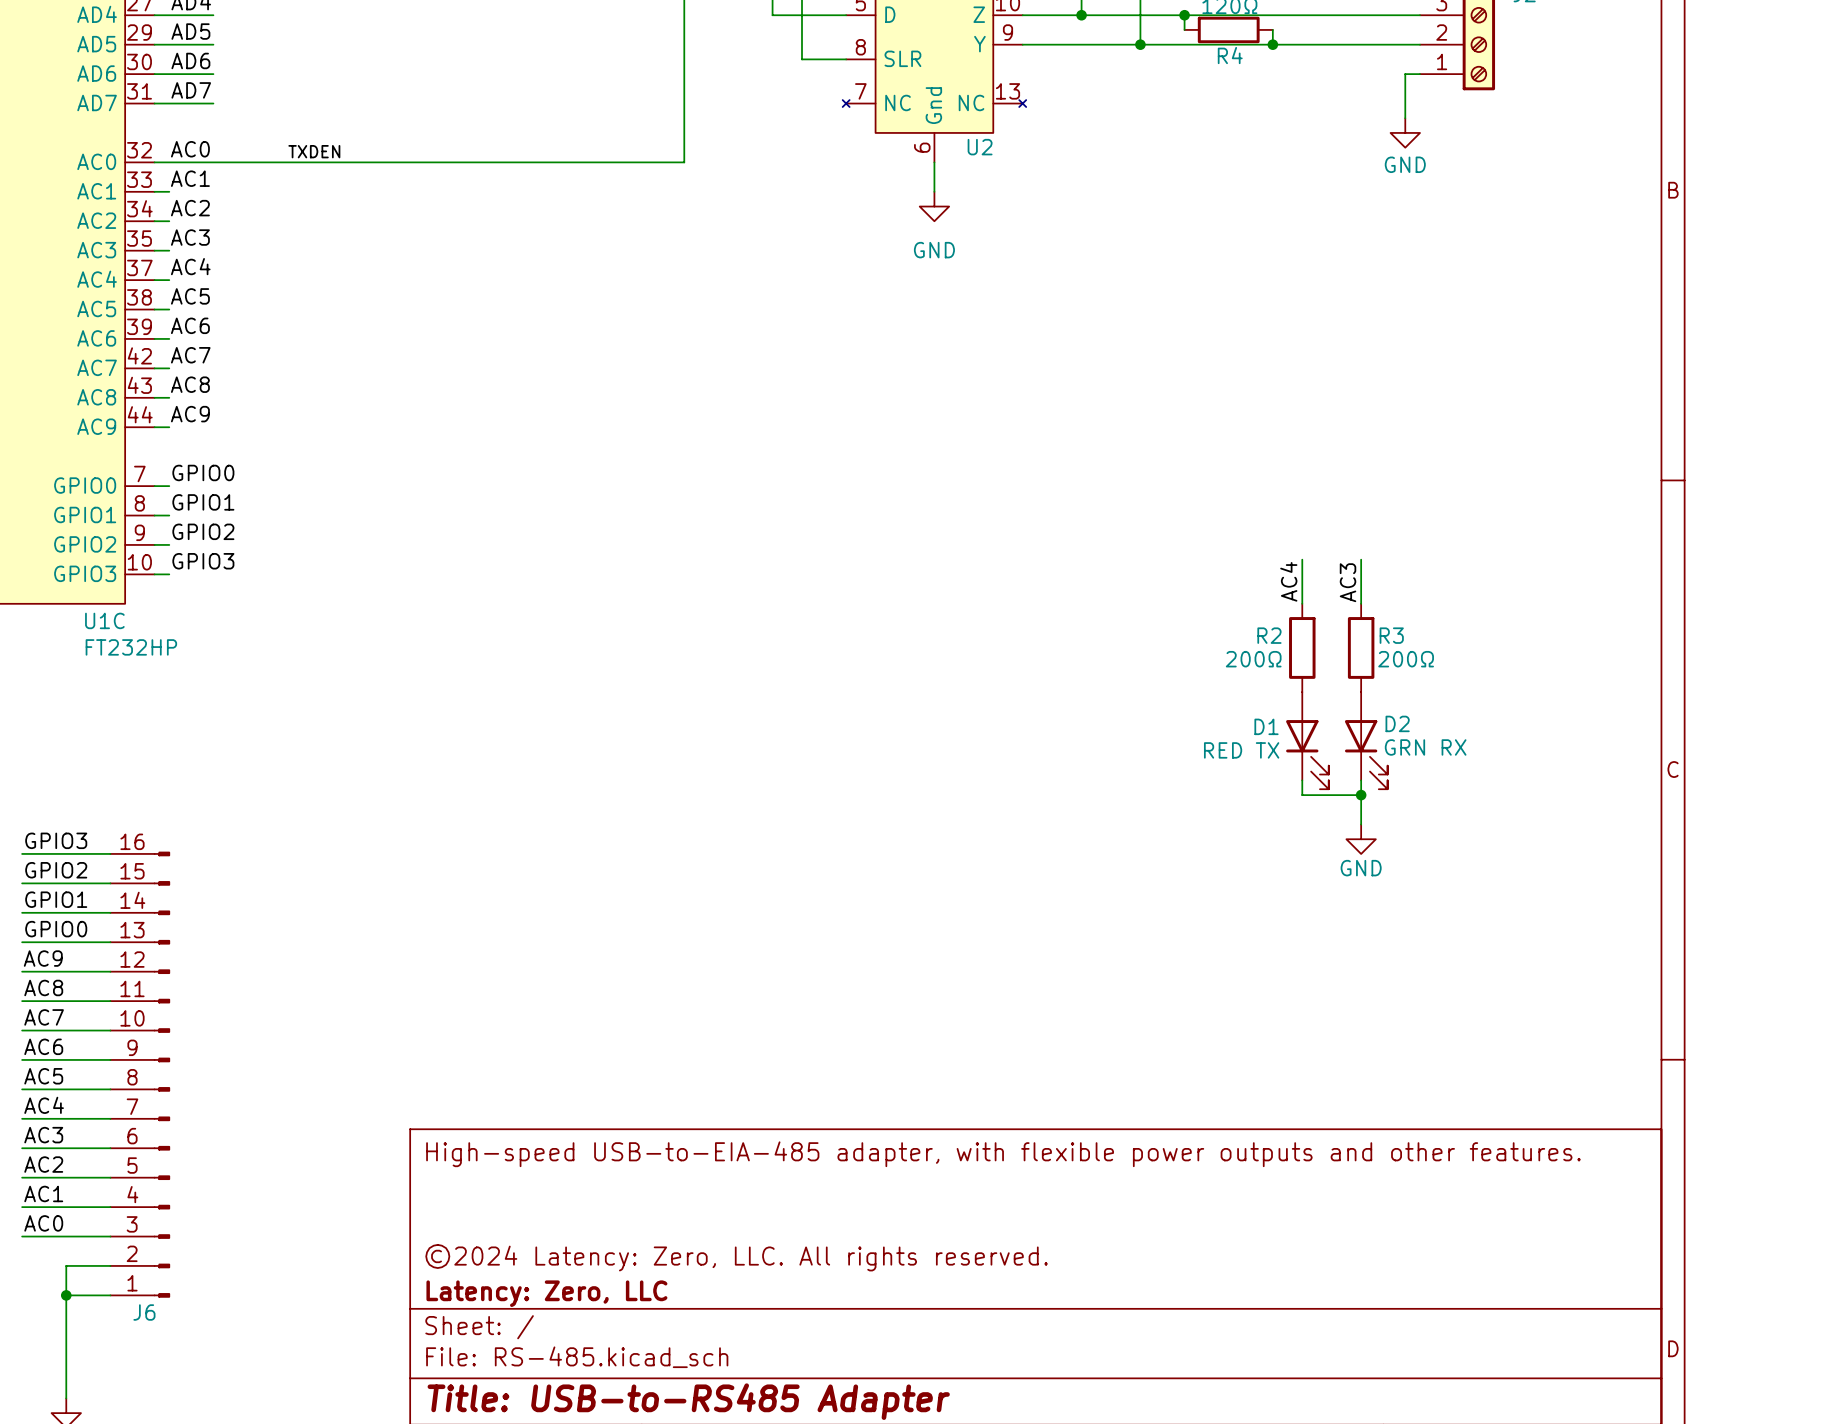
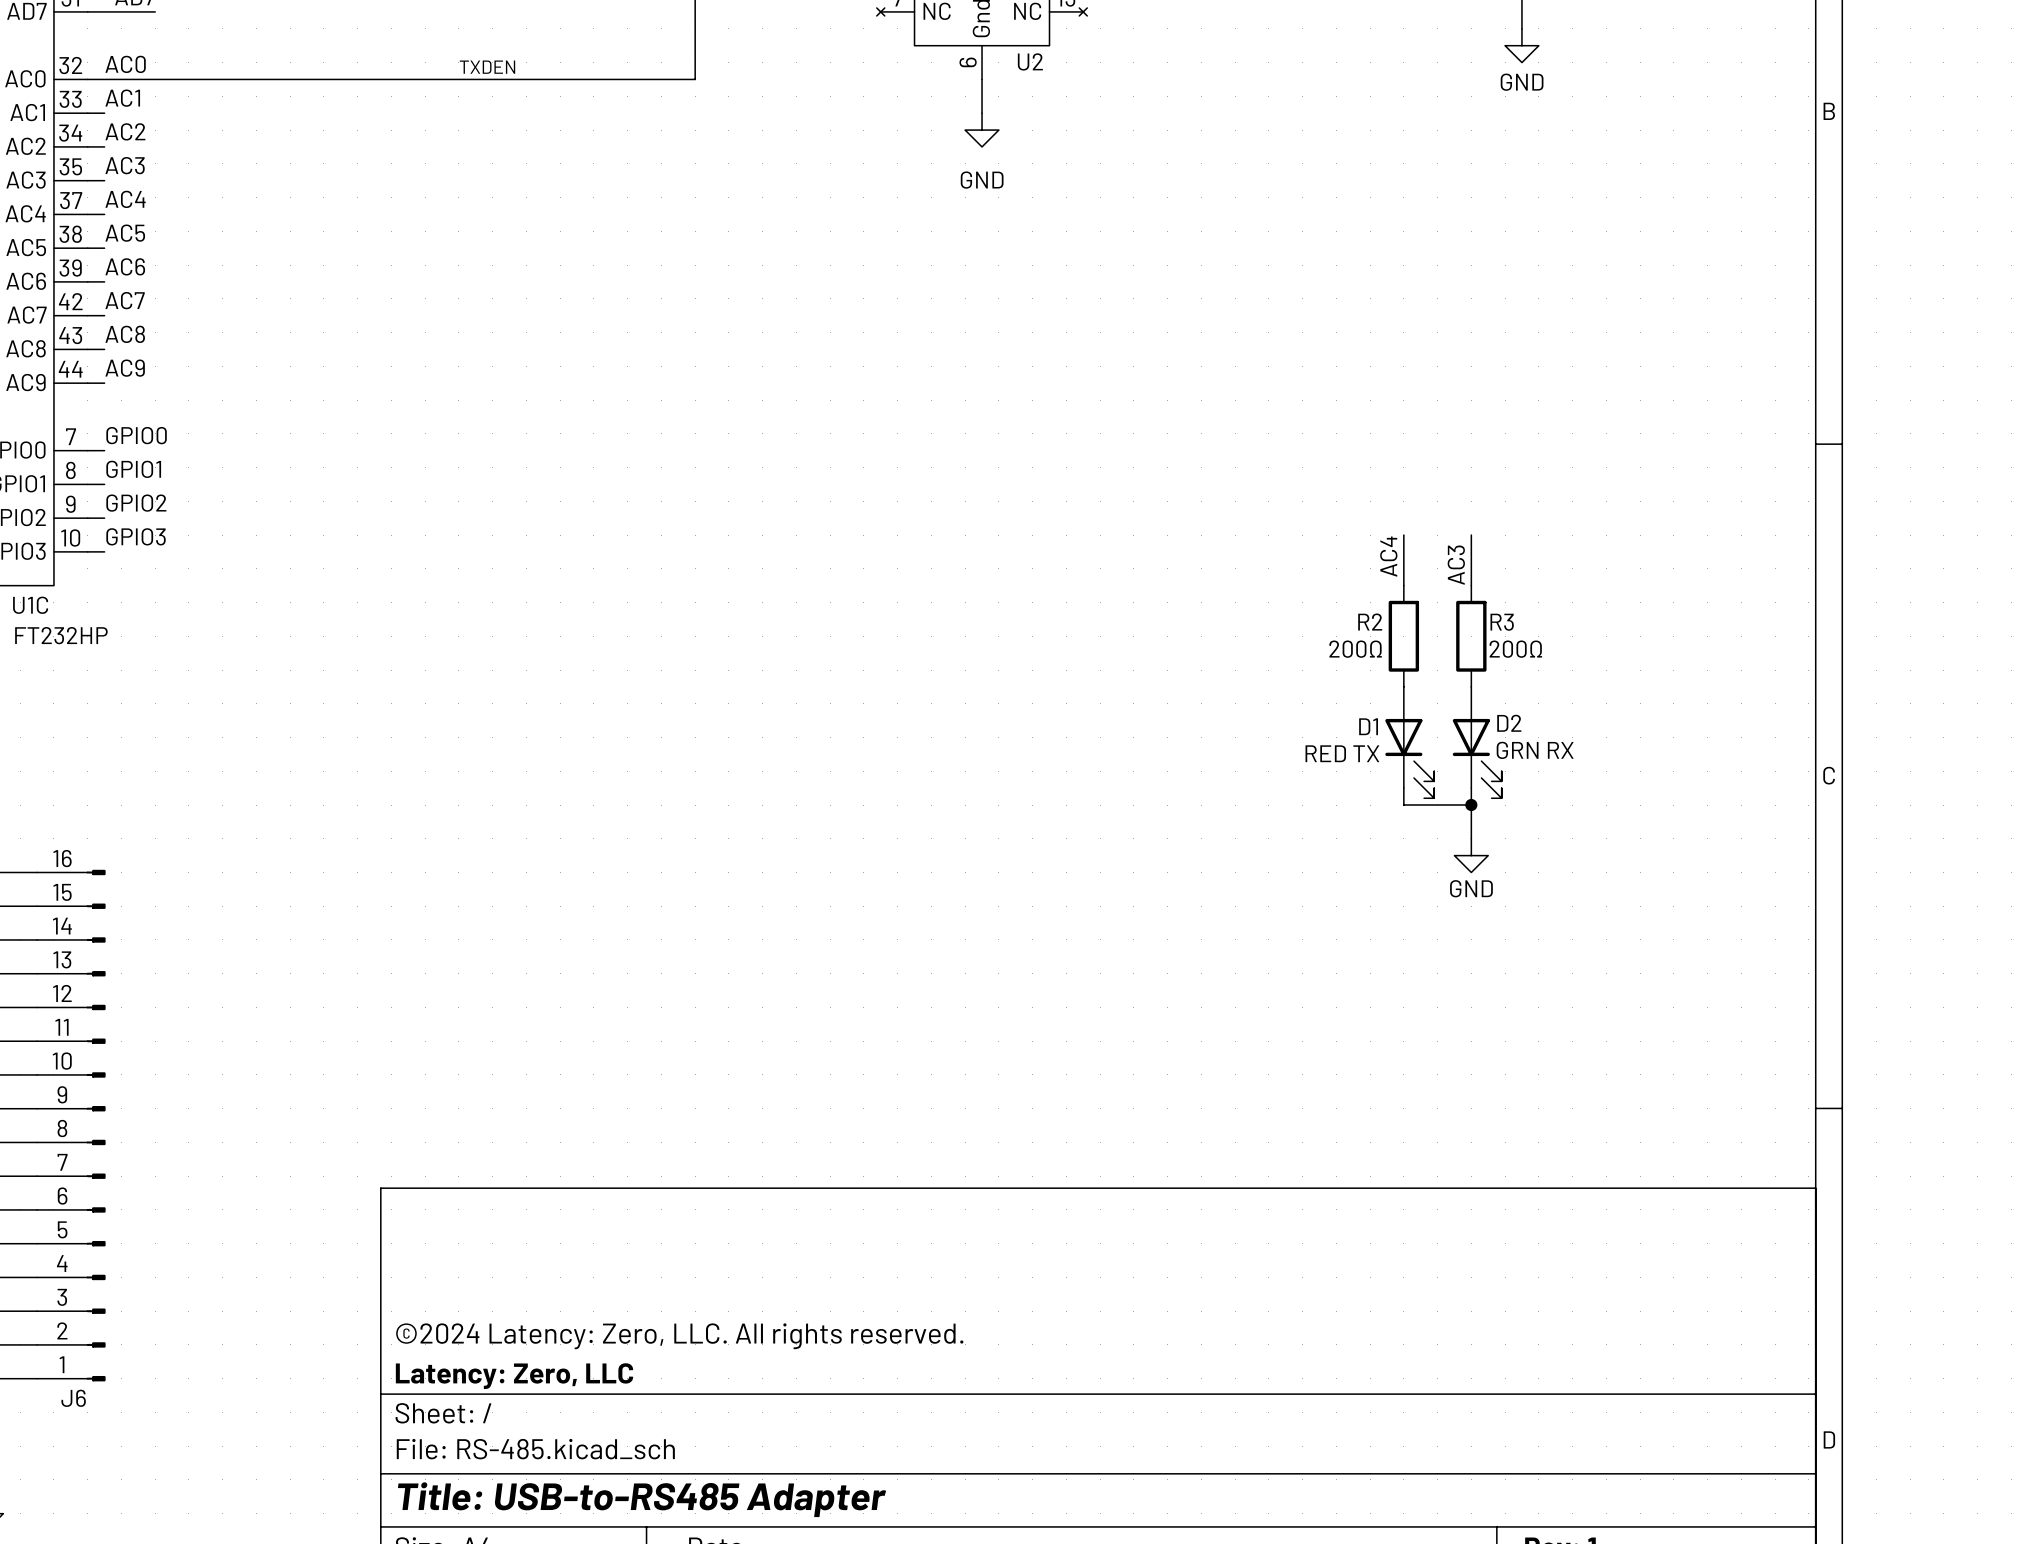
label position: TXDEN (314, 151) -> TXDEN (487, 67)
title block: High-speed USB-to-EIA-485 adapter, with flexible power outputs and other features. (1003, 1154) -> none

